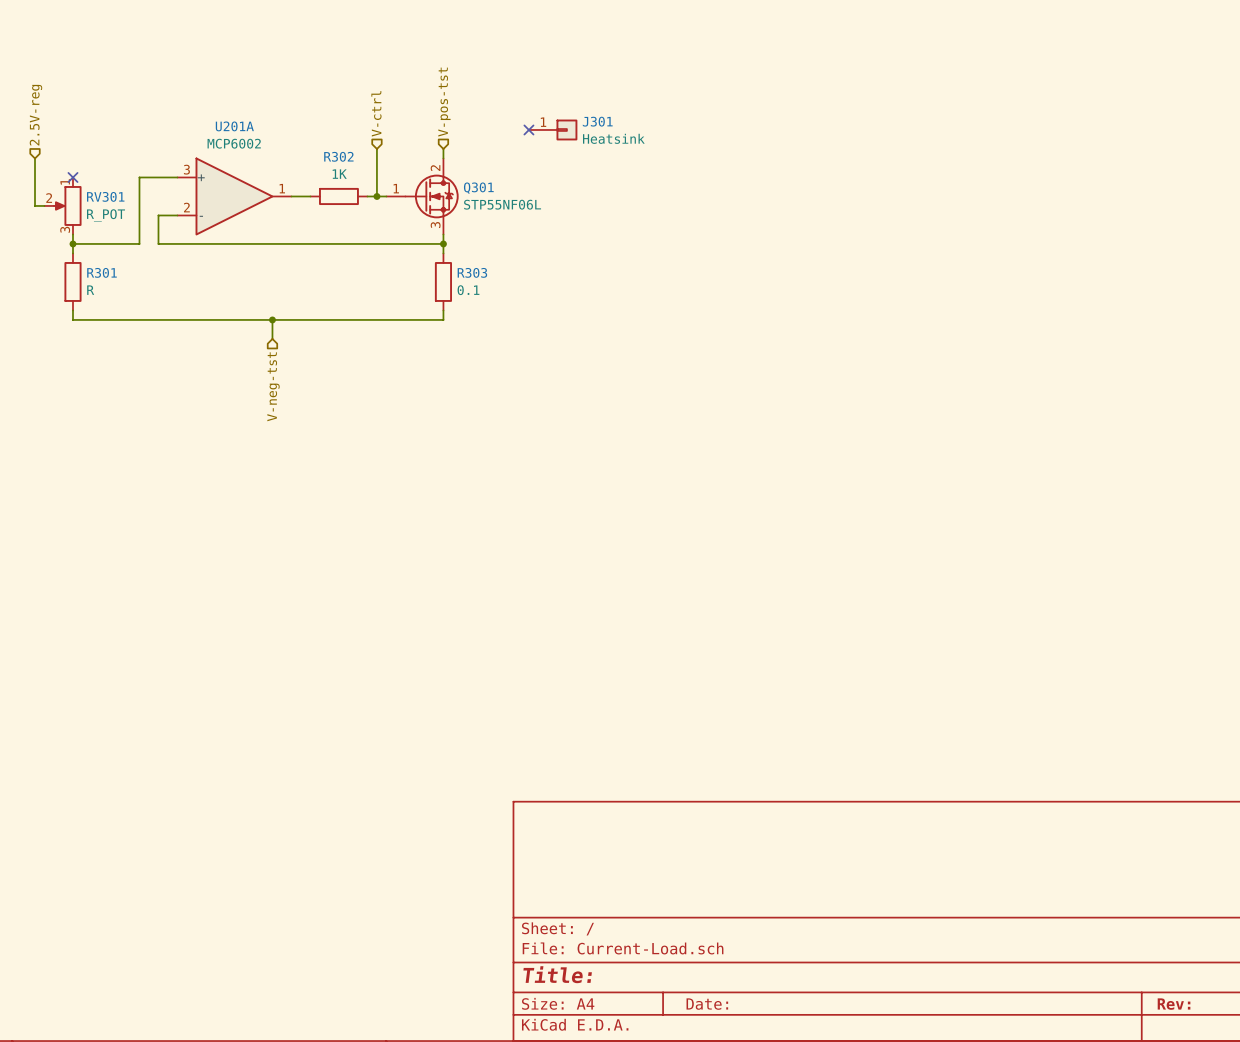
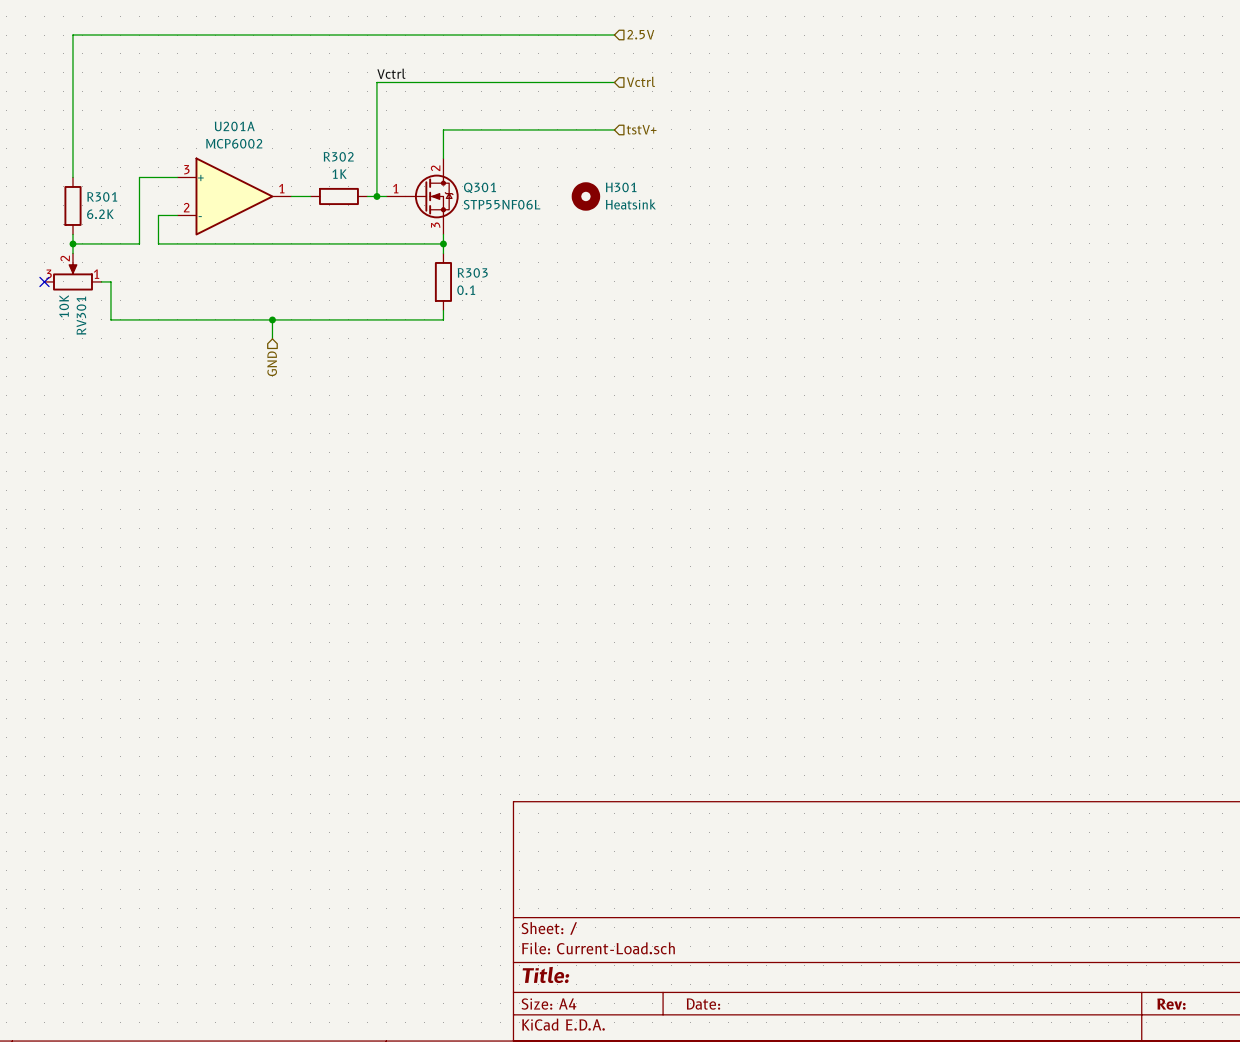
hierarchical label: none -> 2.5V (640, 34)
wire: none -> (614, 35) (72, 35) (72, 177)
label: none -> Vctrl (391, 73)
hierarchical label: none -> Vctrl (640, 81)
wire: none -> (614, 82) (376, 82) (376, 148)
hierarchical label: V-pos-tst (444, 102) -> none
hierarchical label: V-ctrl (376, 113) -> none
hierarchical label: 2.5V-reg (35, 115) -> none
no-connect mark: (528, 129) -> none
J301: Heatsink (553, 129) -> none
wire: none -> (614, 129) (443, 129) (443, 148)
hierarchical label: none -> tstV+ (641, 129)
wire: (35, 158) (35, 205) (44, 205) -> none
no-connect mark: (72, 177) -> none
H301: none -> Heatsink (585, 196)
RV301 position: (63, 205) -> (72, 271)
RV301 rotation: 0° (67, 205) -> 90° clockwise (72, 276)
RV301 value: R_POT (106, 215) -> 10K (64, 306)
no-connect mark: none -> (44, 281)
R301 position: (72, 281) -> (72, 205)
R301 value: R (90, 290) -> 6.2K (100, 214)
wire: (72, 310) (72, 319) (110, 319) -> (101, 281) (110, 281) (110, 319)
hierarchical label: V-neg-tst (273, 386) -> GND (272, 363)

